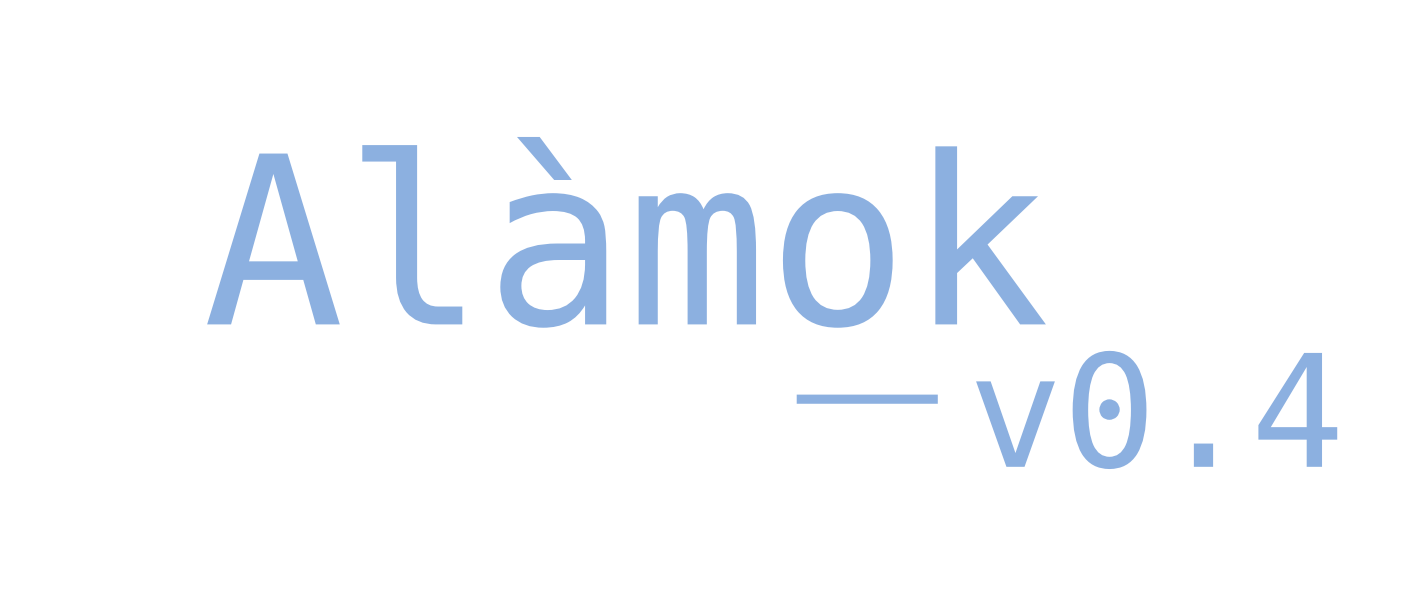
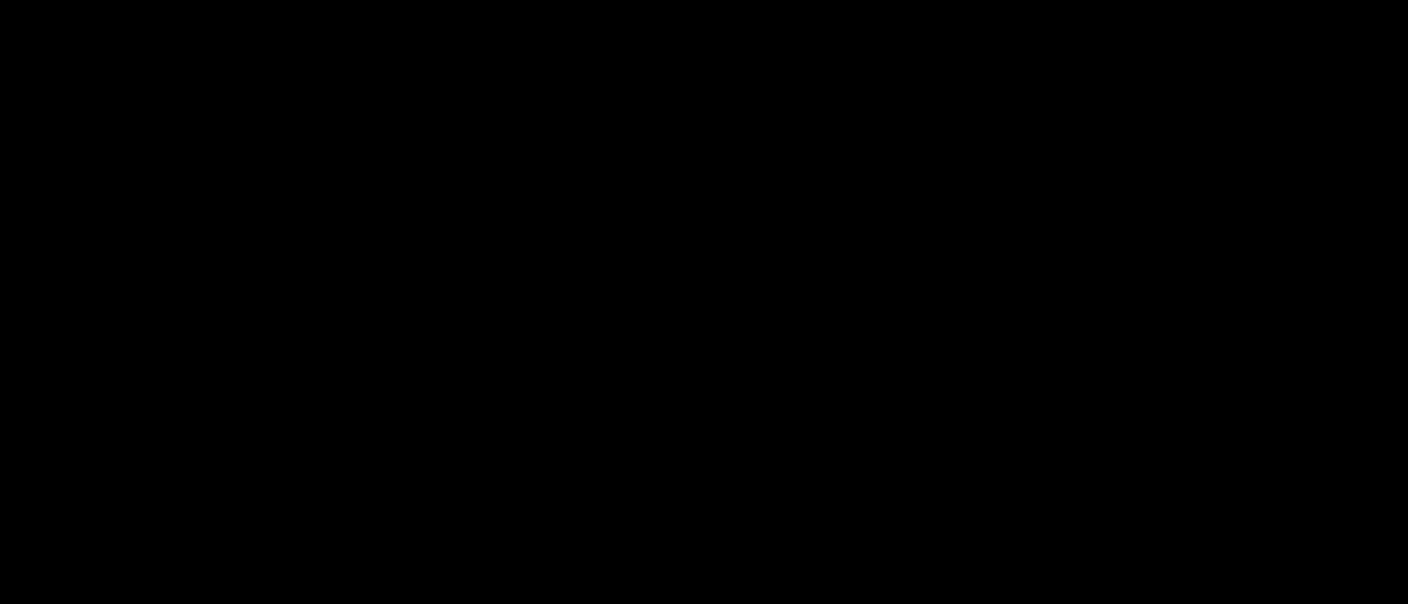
text: Alàmok (626, 232) -> none
text: _ (867, 399) -> none
text: v0.4 (1156, 409) -> none

